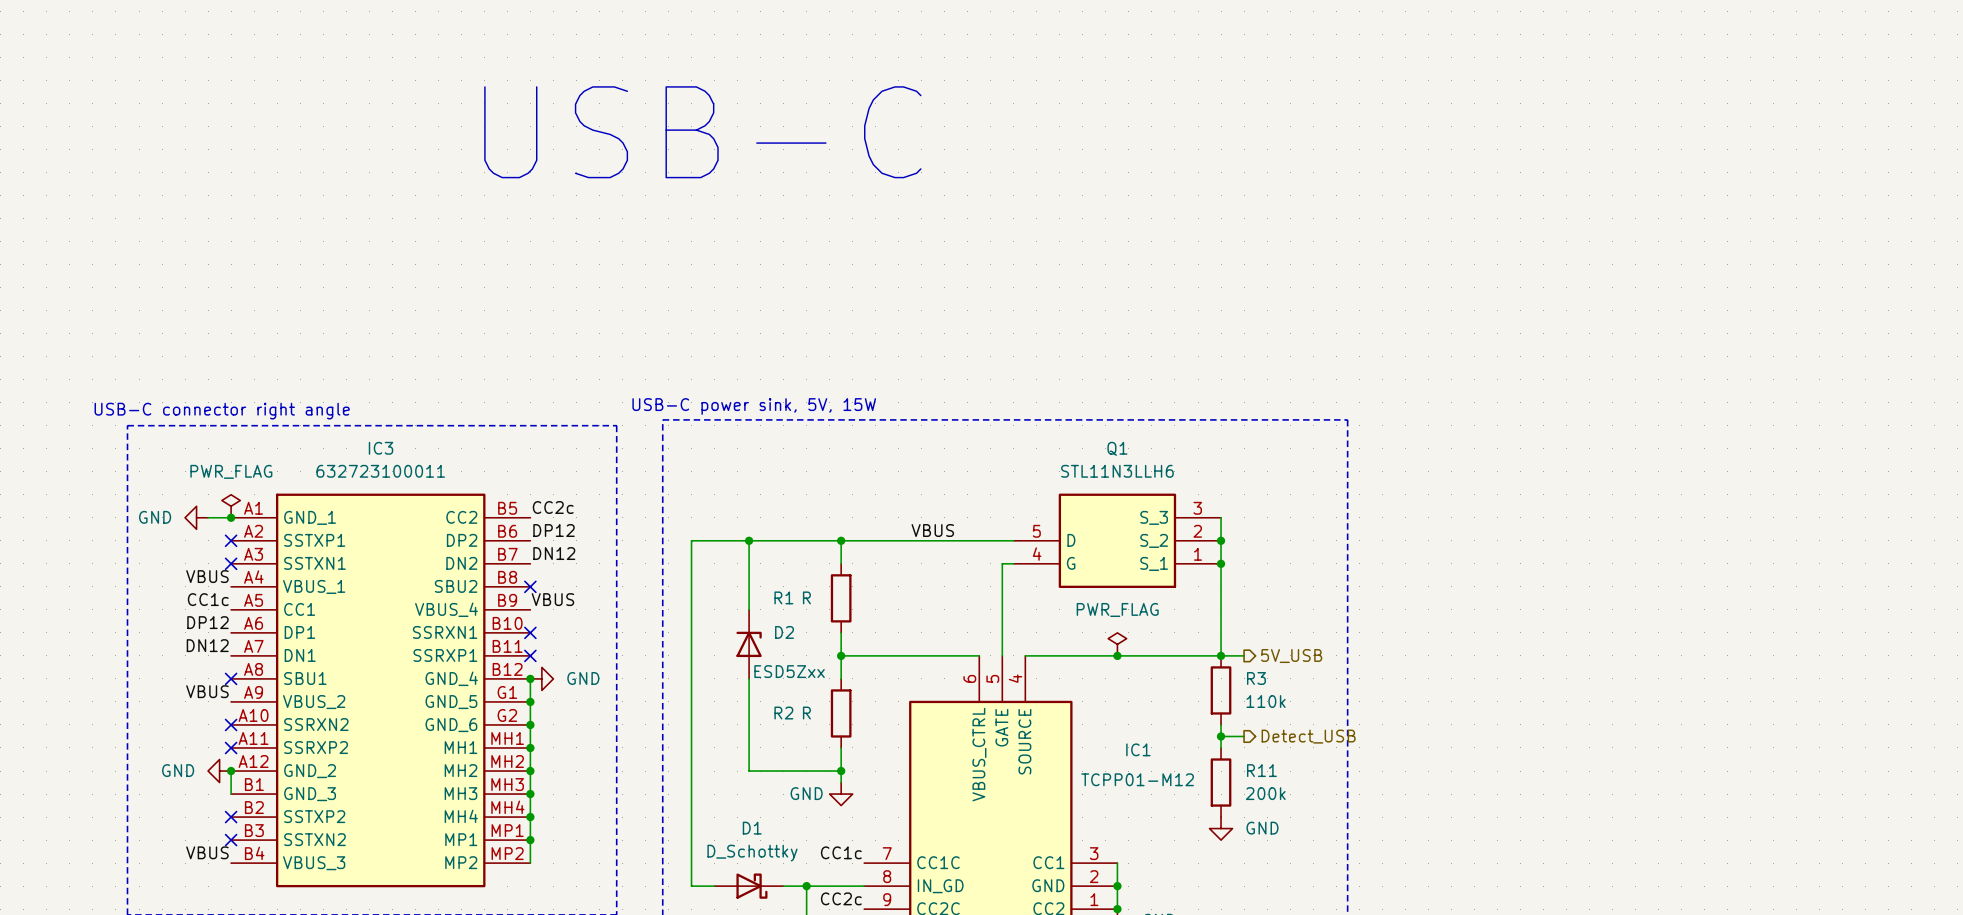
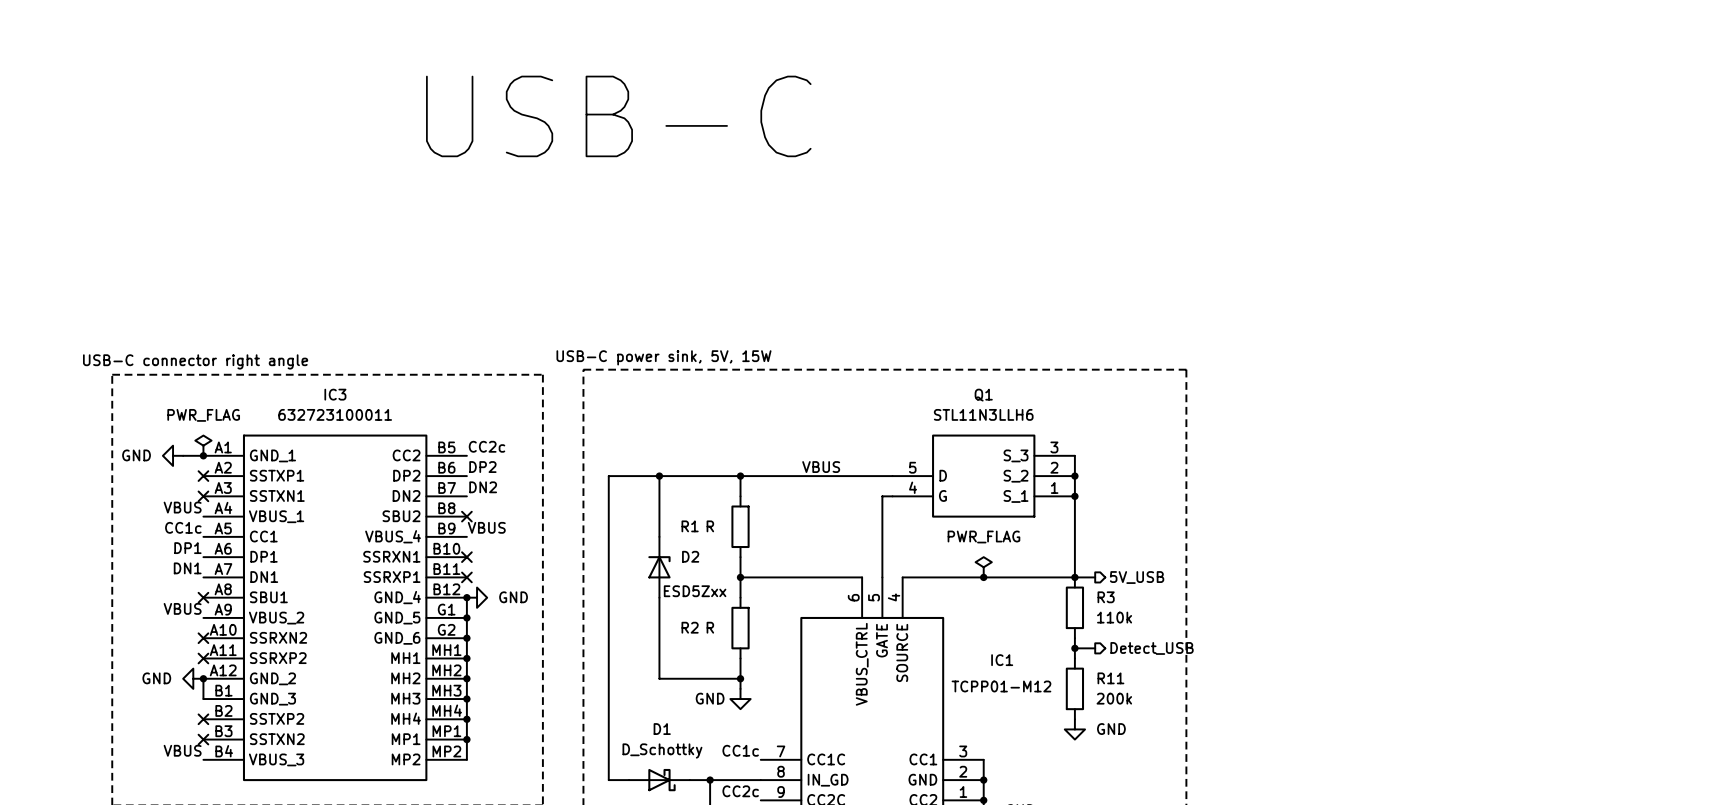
label: DP12 (554, 530) -> DP2 (482, 467)
label: DN12 (554, 553) -> DN2 (483, 487)
label: DP12 (207, 622) -> DP1 (187, 548)
label: DN12 (207, 645) -> DN1 (187, 568)

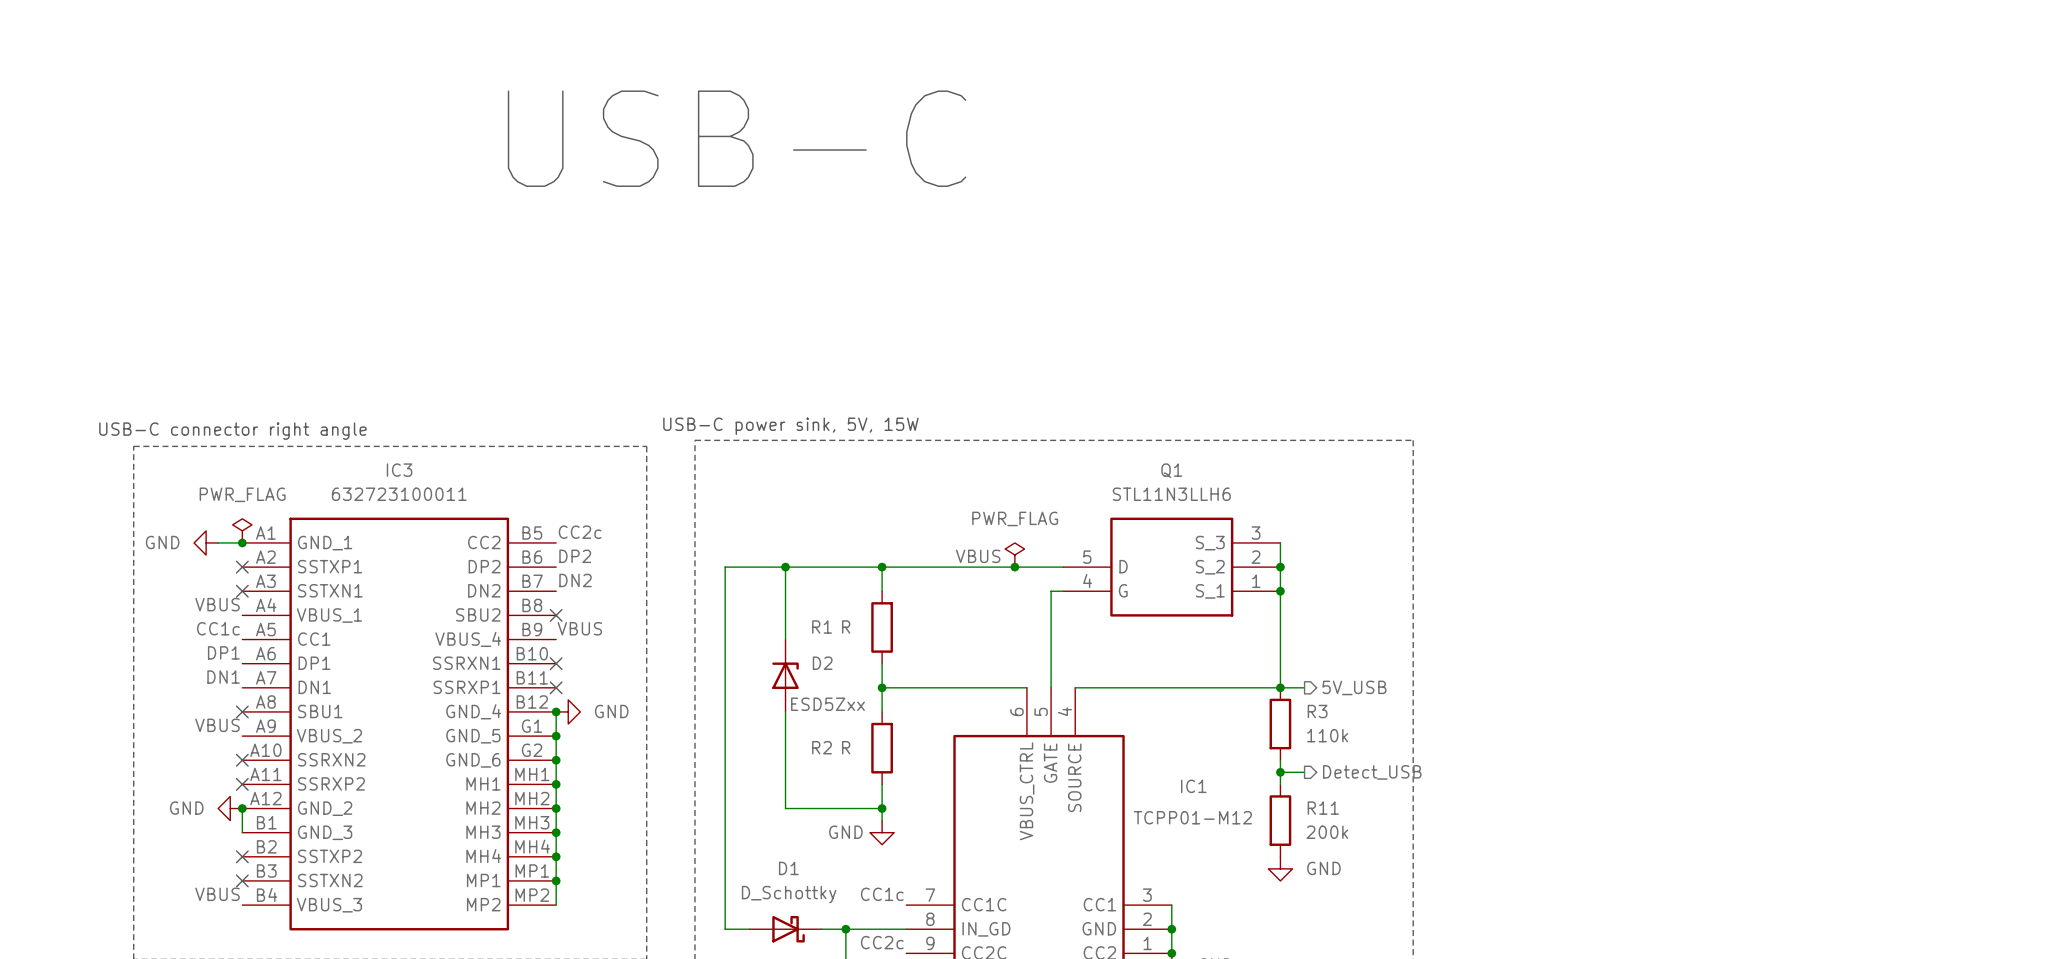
junction: none -> (1014, 567)
power symbol position: PWR_FLAG (983, 567) -> PWR_FLAG (1014, 555)
junction: (983, 577) -> none

